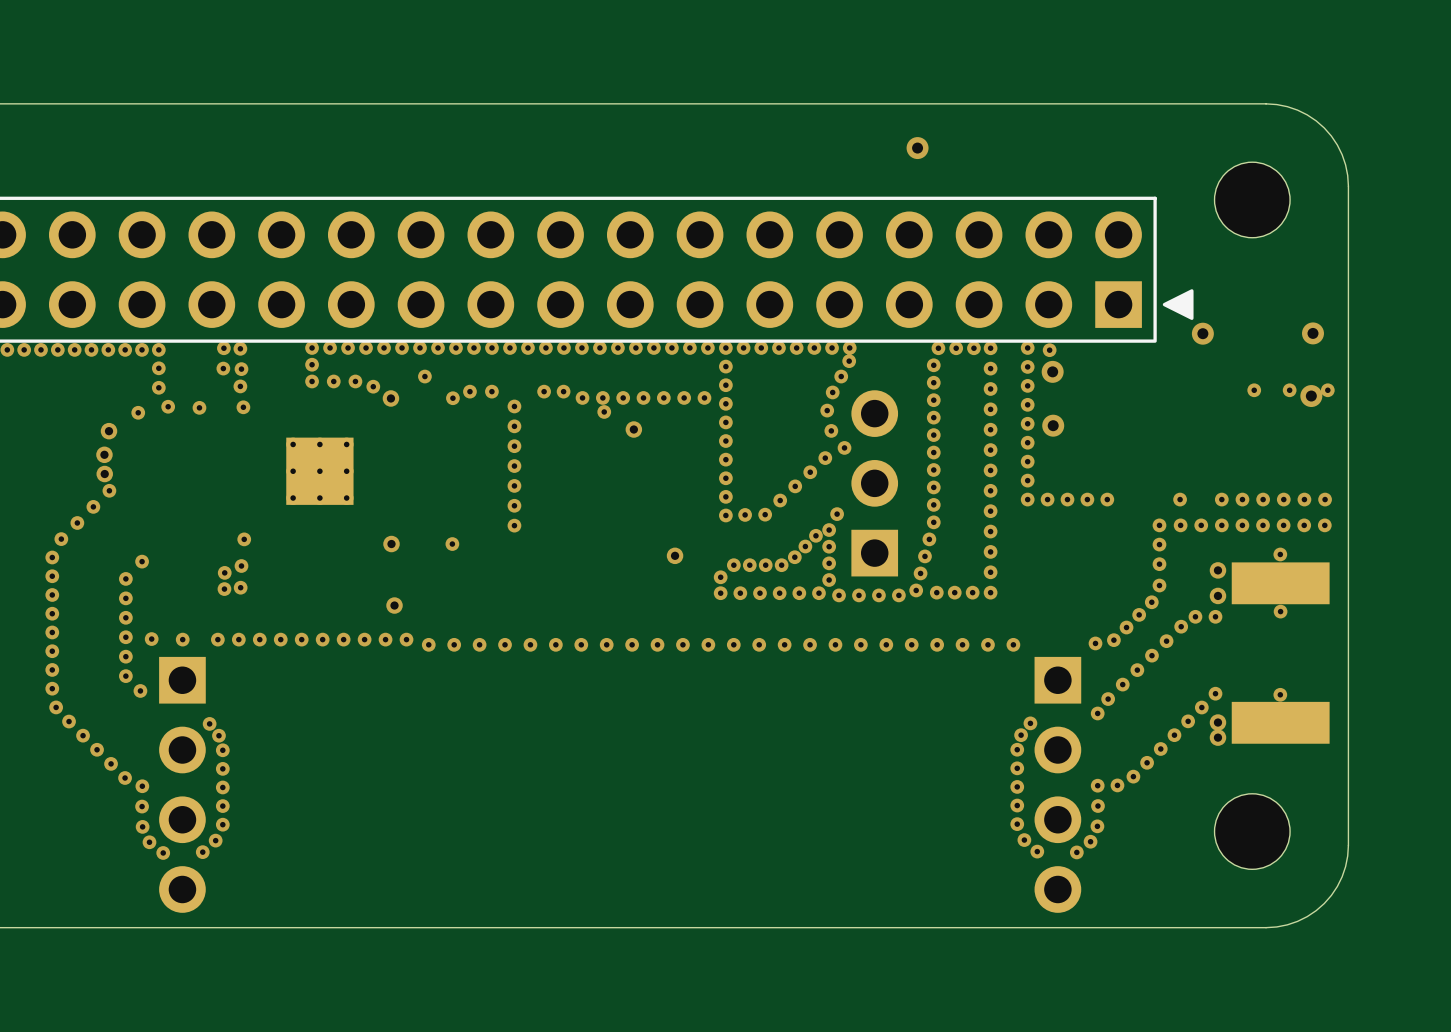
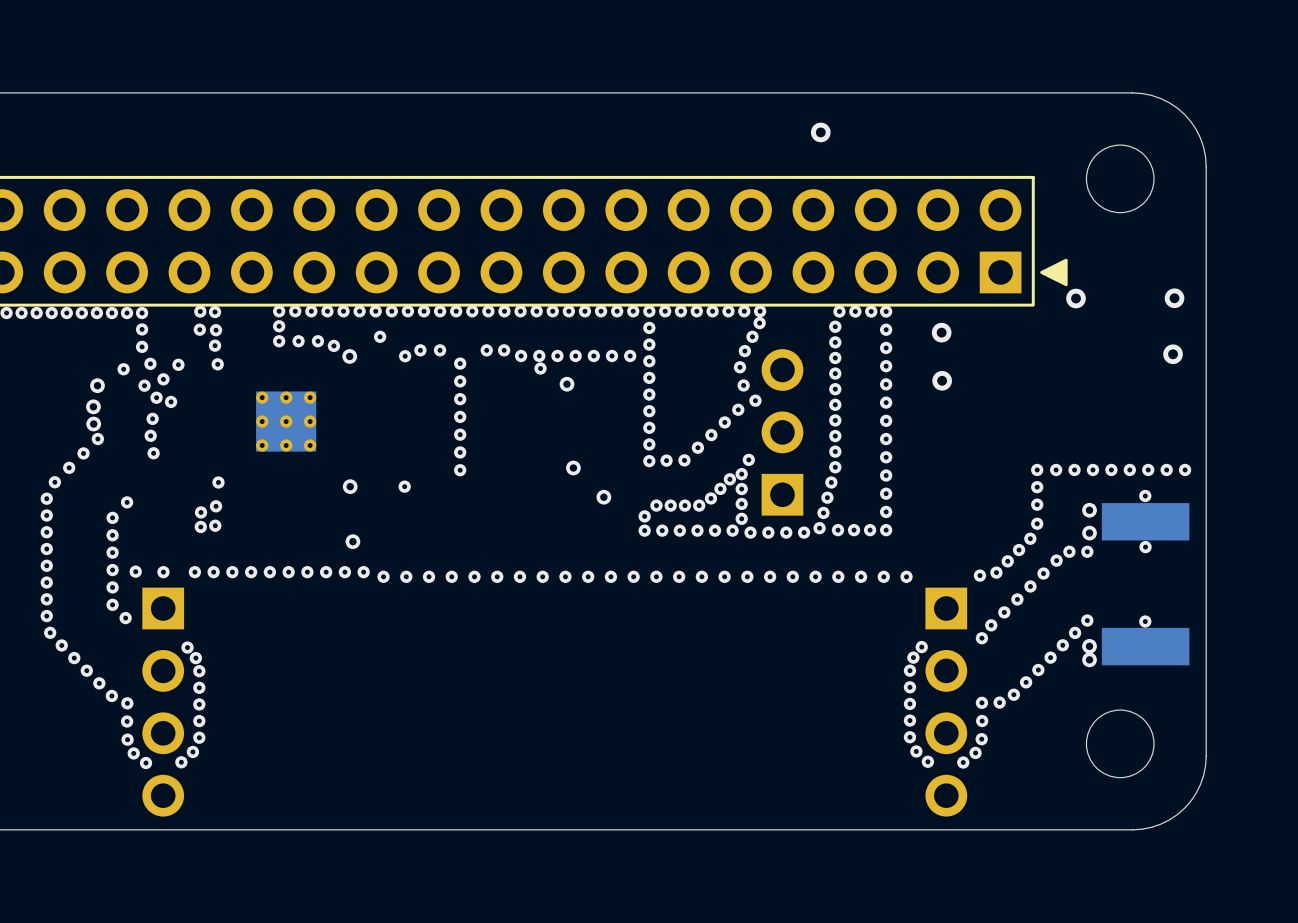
via: (1027, 347) -> none
via: (1049, 350) -> none
via: (1027, 366) -> none
via: (1027, 385) -> none
via: (1254, 390) -> none
via: (1289, 390) -> none
via: (1327, 390) -> none
via: (1027, 404) -> none
via: (1027, 423) -> none
via: none -> (163, 379)
via: none -> (144, 385)
via: (1027, 442) -> none
via: none -> (156, 397)
via: none -> (171, 401)
via: (1027, 461) -> none
via: none -> (152, 418)
via: (1027, 480) -> none
via: none -> (150, 435)
via: (1027, 499) -> none
via: (1047, 499) -> none
via: (1067, 499) -> none
via: (1087, 499) -> none
via: (1107, 499) -> none
via: (1180, 499) -> none
via: (1221, 499) -> none
via: (1242, 499) -> none
via: (1263, 499) -> none
via: (1283, 499) -> none
via: (1304, 499) -> none
via: (1325, 499) -> none
via: none -> (153, 453)
via: none -> (573, 468)

